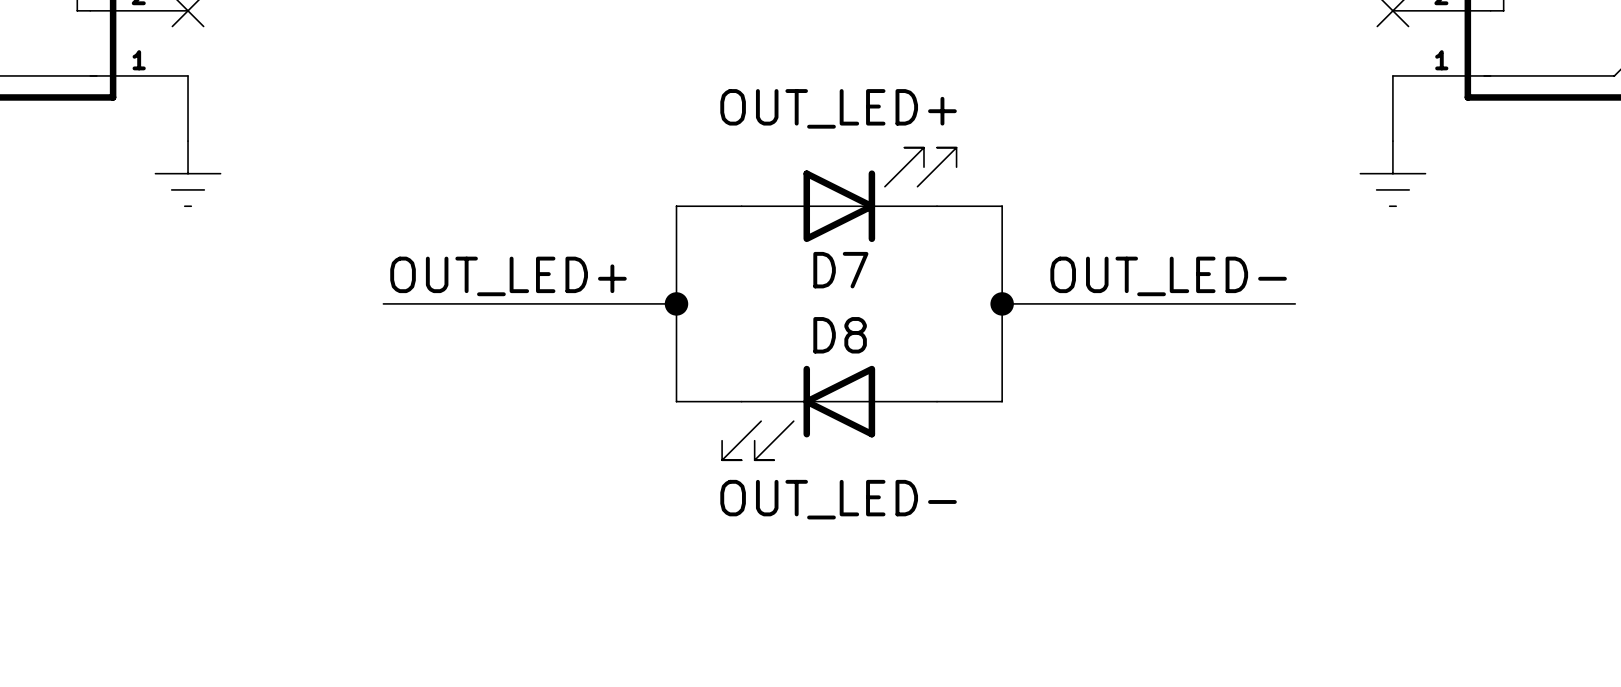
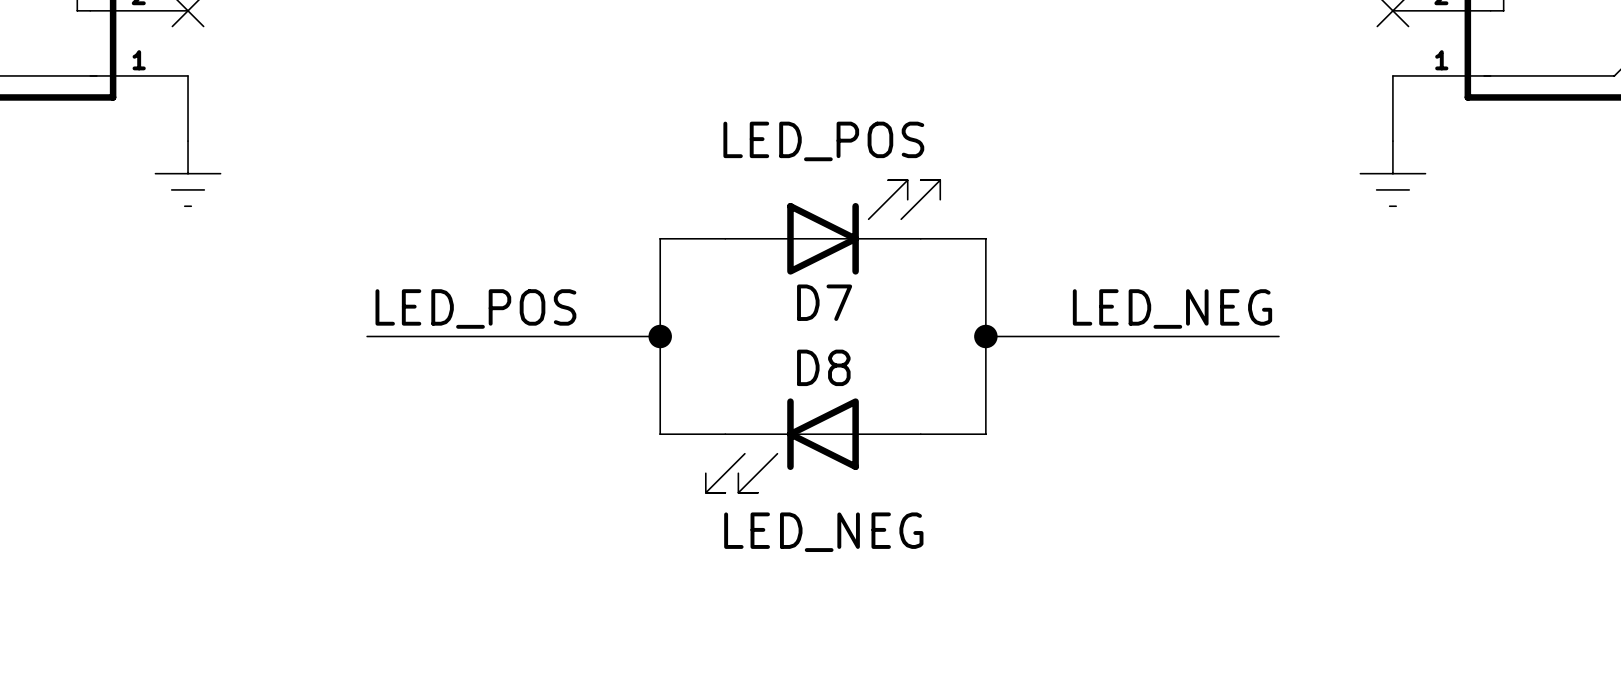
D7 value: OUT_LED+ (838, 108) -> LED_POS (823, 141)
D7 position: (849, 194) -> (832, 227)
wire: (741, 206) (676, 206) (676, 401) (741, 401) -> (725, 238) (660, 238) (660, 434) (725, 434)
wire: (937, 206) (1002, 206) (1002, 401) (937, 401) -> (920, 238) (985, 238) (985, 434) (920, 434)
label: OUT_LED+ (508, 276) -> none
label: OUT_LED- (1168, 276) -> none
wire: (383, 303) (676, 303) -> (367, 336) (660, 336)
junction position: (676, 303) -> (660, 336)
wire: (1002, 303) (1295, 303) -> (985, 336) (1278, 336)
junction position: (1002, 303) -> (985, 336)
label: none -> LED_POS (475, 308)
label: none -> LED_NEG (1172, 308)
D8 position: (829, 413) -> (813, 445)
D8 value: OUT_LED- (838, 499) -> LED_NEG (823, 532)

